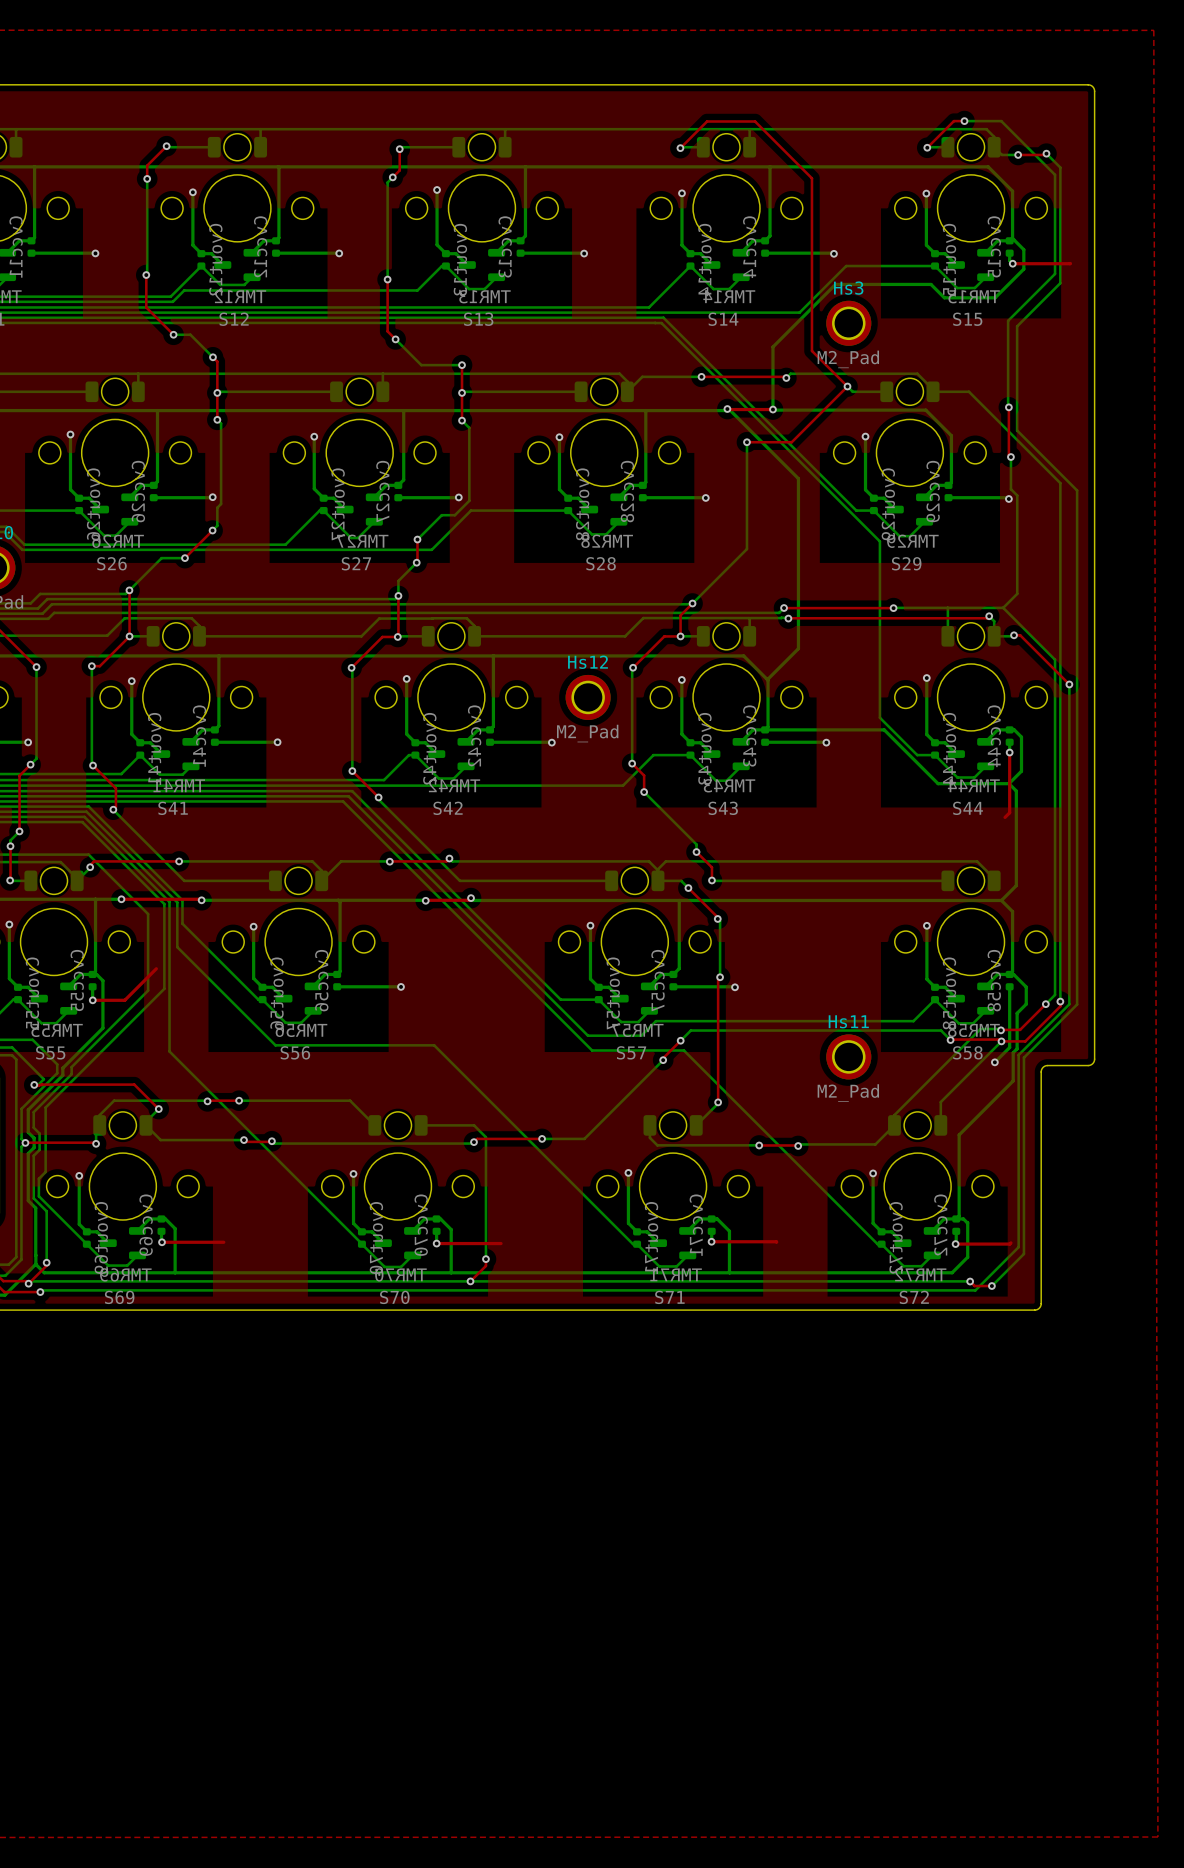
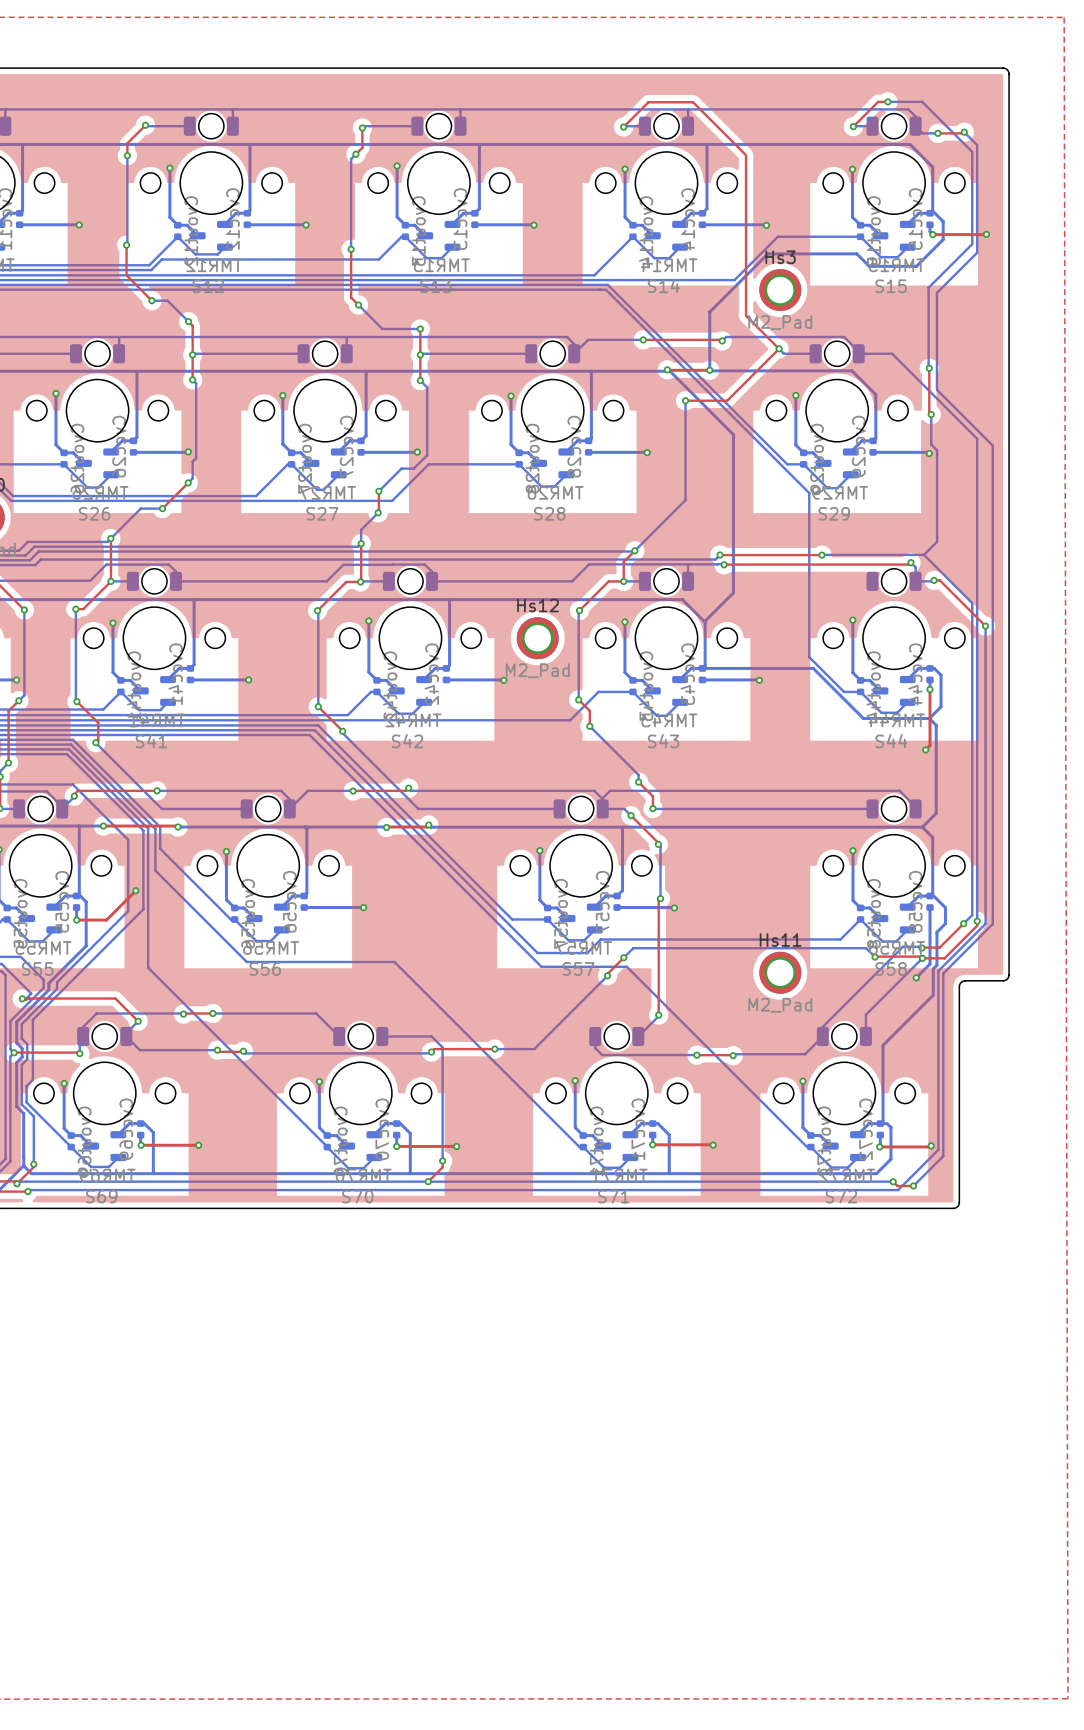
via: none -> (986, 234)
bottom track: (947, 608) (947, 636) -> none
via: none -> (925, 749)
via: none -> (135, 890)
via: none -> (198, 1145)
via: none -> (713, 1145)
via: none -> (931, 1145)
via: none -> (456, 1146)

